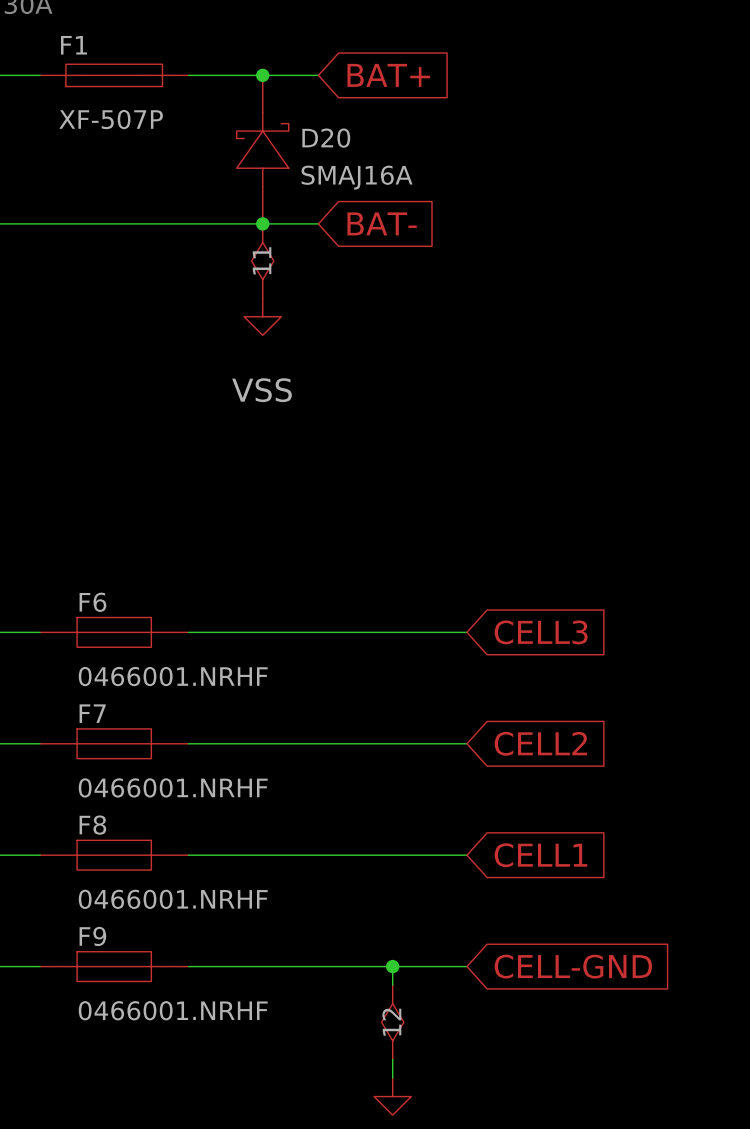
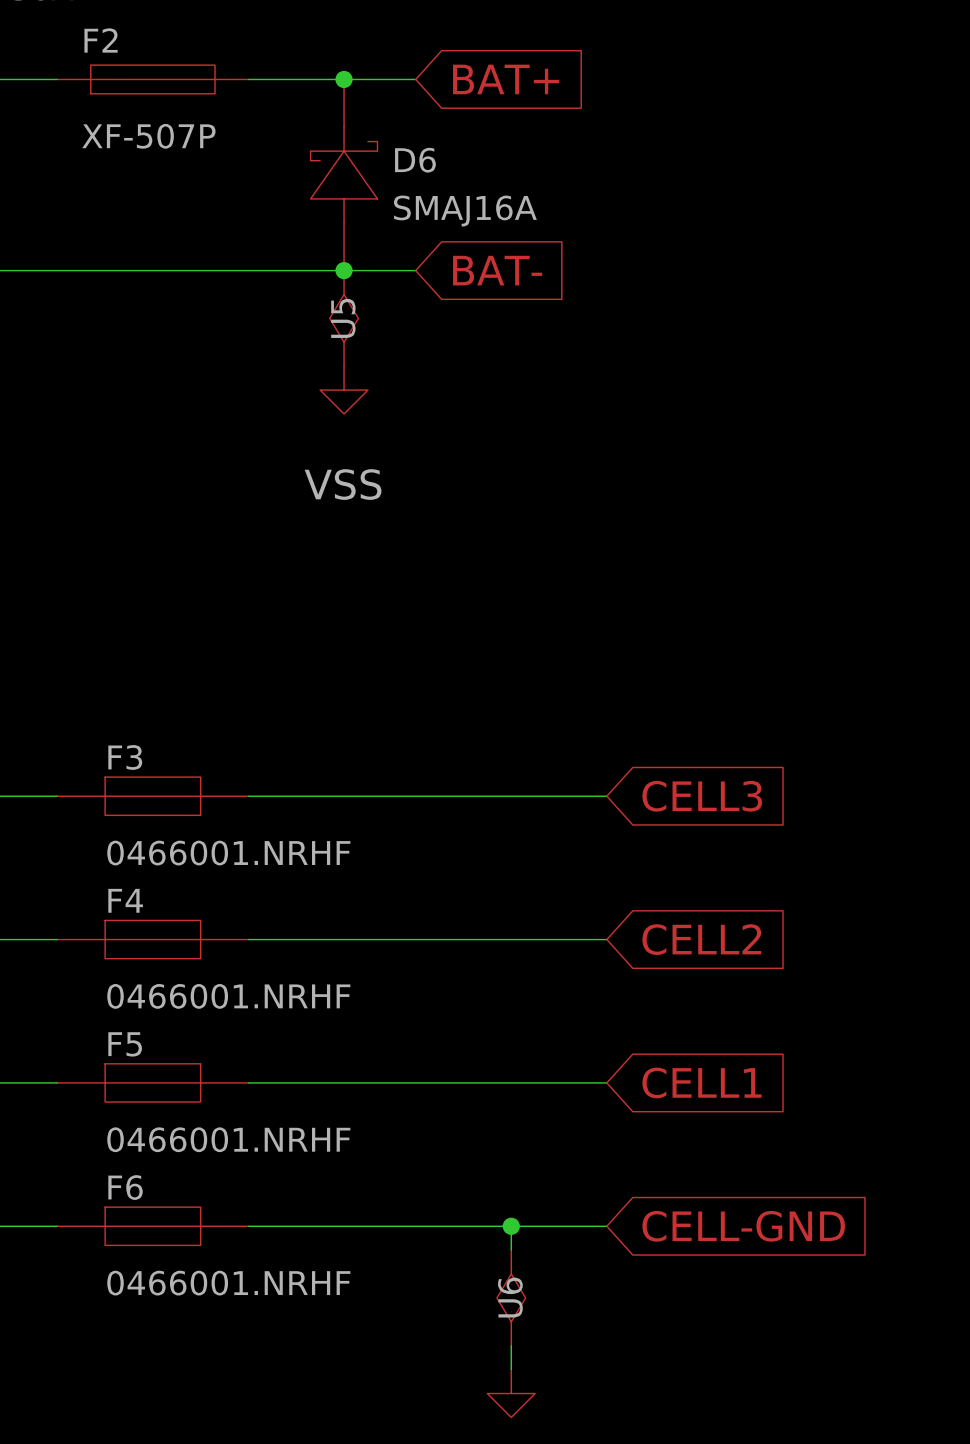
F1 name: F1 (74, 45) -> F2 (101, 40)
D20 name: D20 (326, 138) -> D6 (415, 160)
11 name: 11 (262, 260) -> U5 (343, 318)
F6 name: F6 (92, 602) -> F3 (125, 757)
F7 name: F7 (92, 713) -> F4 (125, 900)
F8 name: F8 (92, 825) -> F5 (125, 1044)
F9 name: F9 (92, 936) -> F6 (125, 1187)
12 name: 12 (391, 1022) -> U6 (510, 1297)

